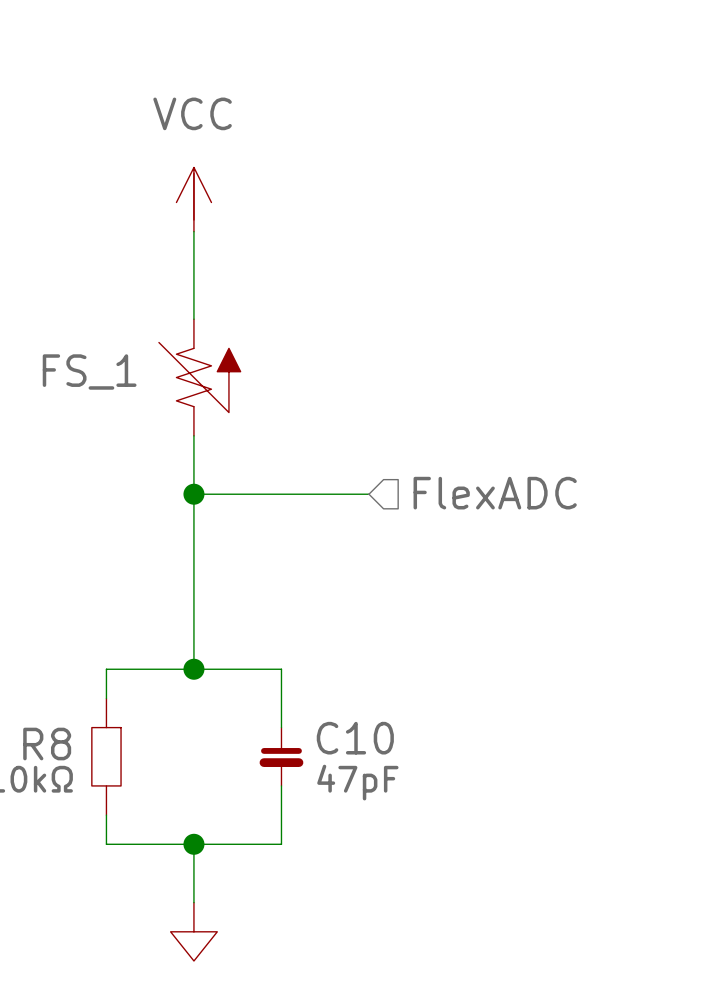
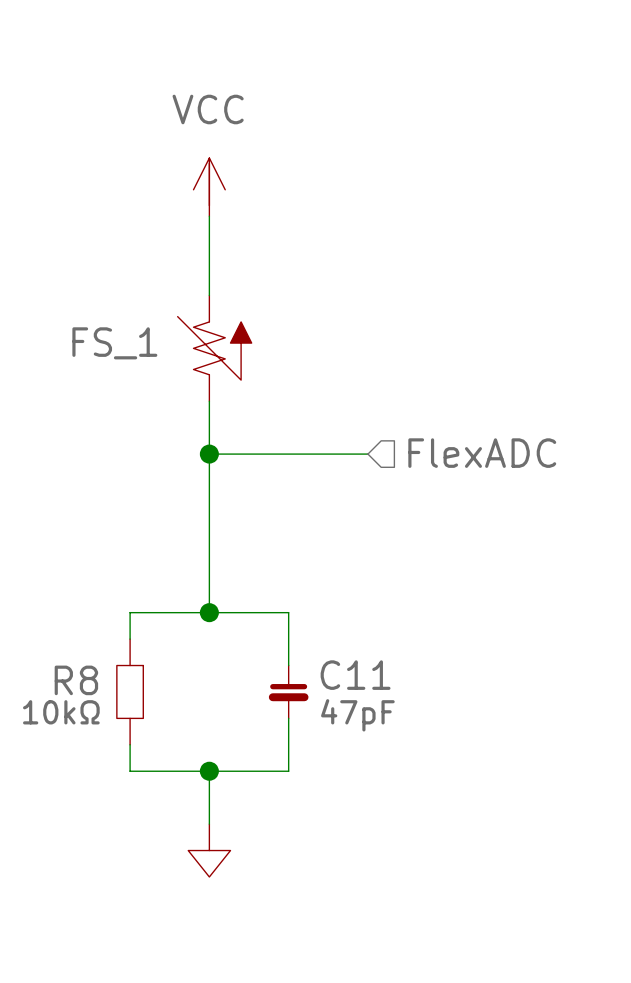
C10 name: C10 (355, 738) -> C11 (355, 675)

